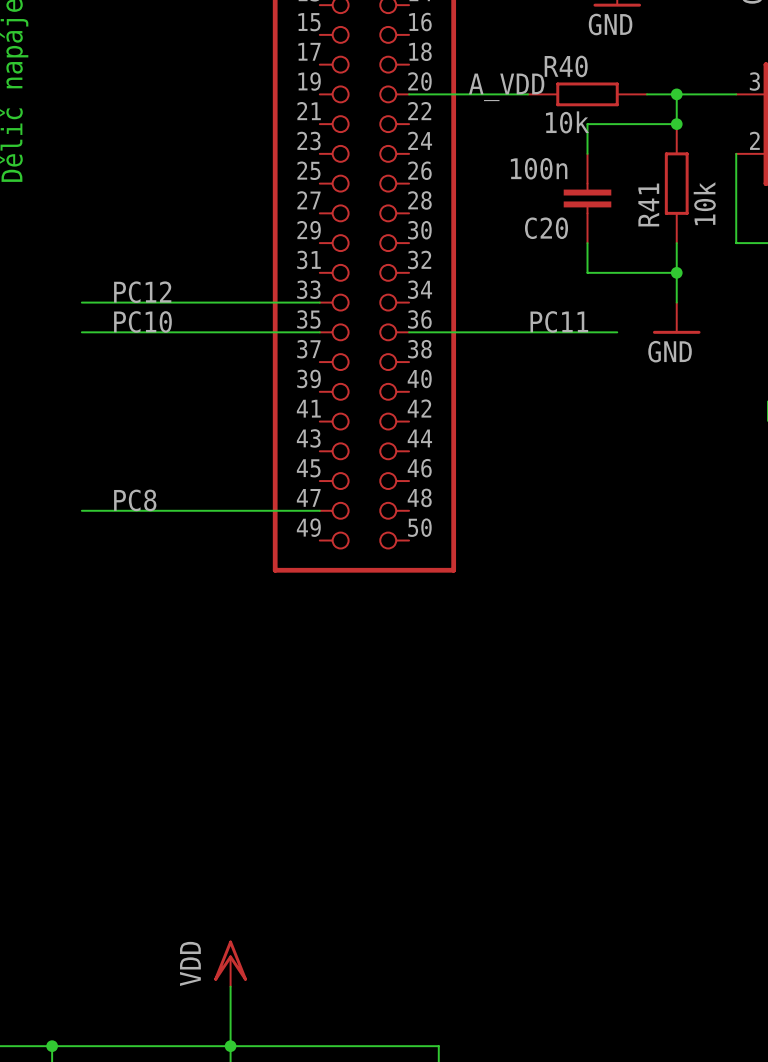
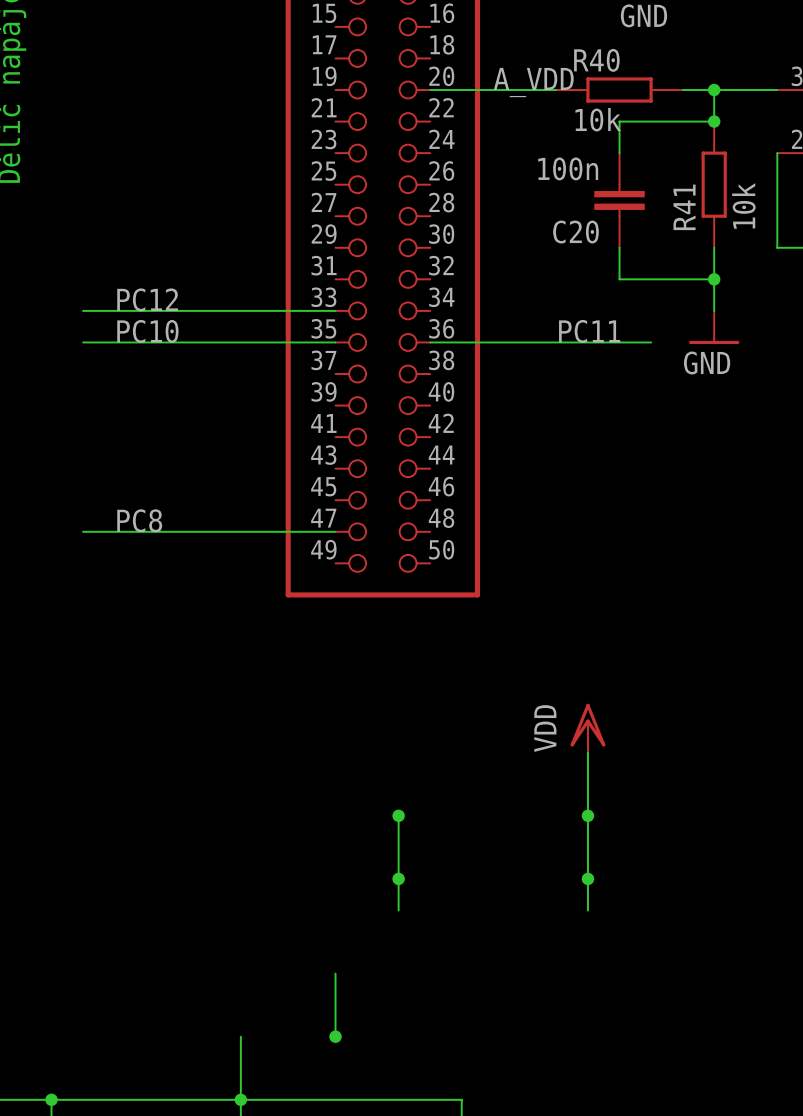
power symbol: none -> VDD (587, 728)
wire: none -> (587, 752) (587, 910)
wire: none -> (398, 815) (398, 910)
junction: none -> (398, 815)
junction: none -> (587, 815)
junction: none -> (398, 878)
junction: none -> (587, 878)
wire: none -> (335, 973) (335, 1036)
power symbol: VDD (230, 963) -> none
junction: none -> (335, 1036)

